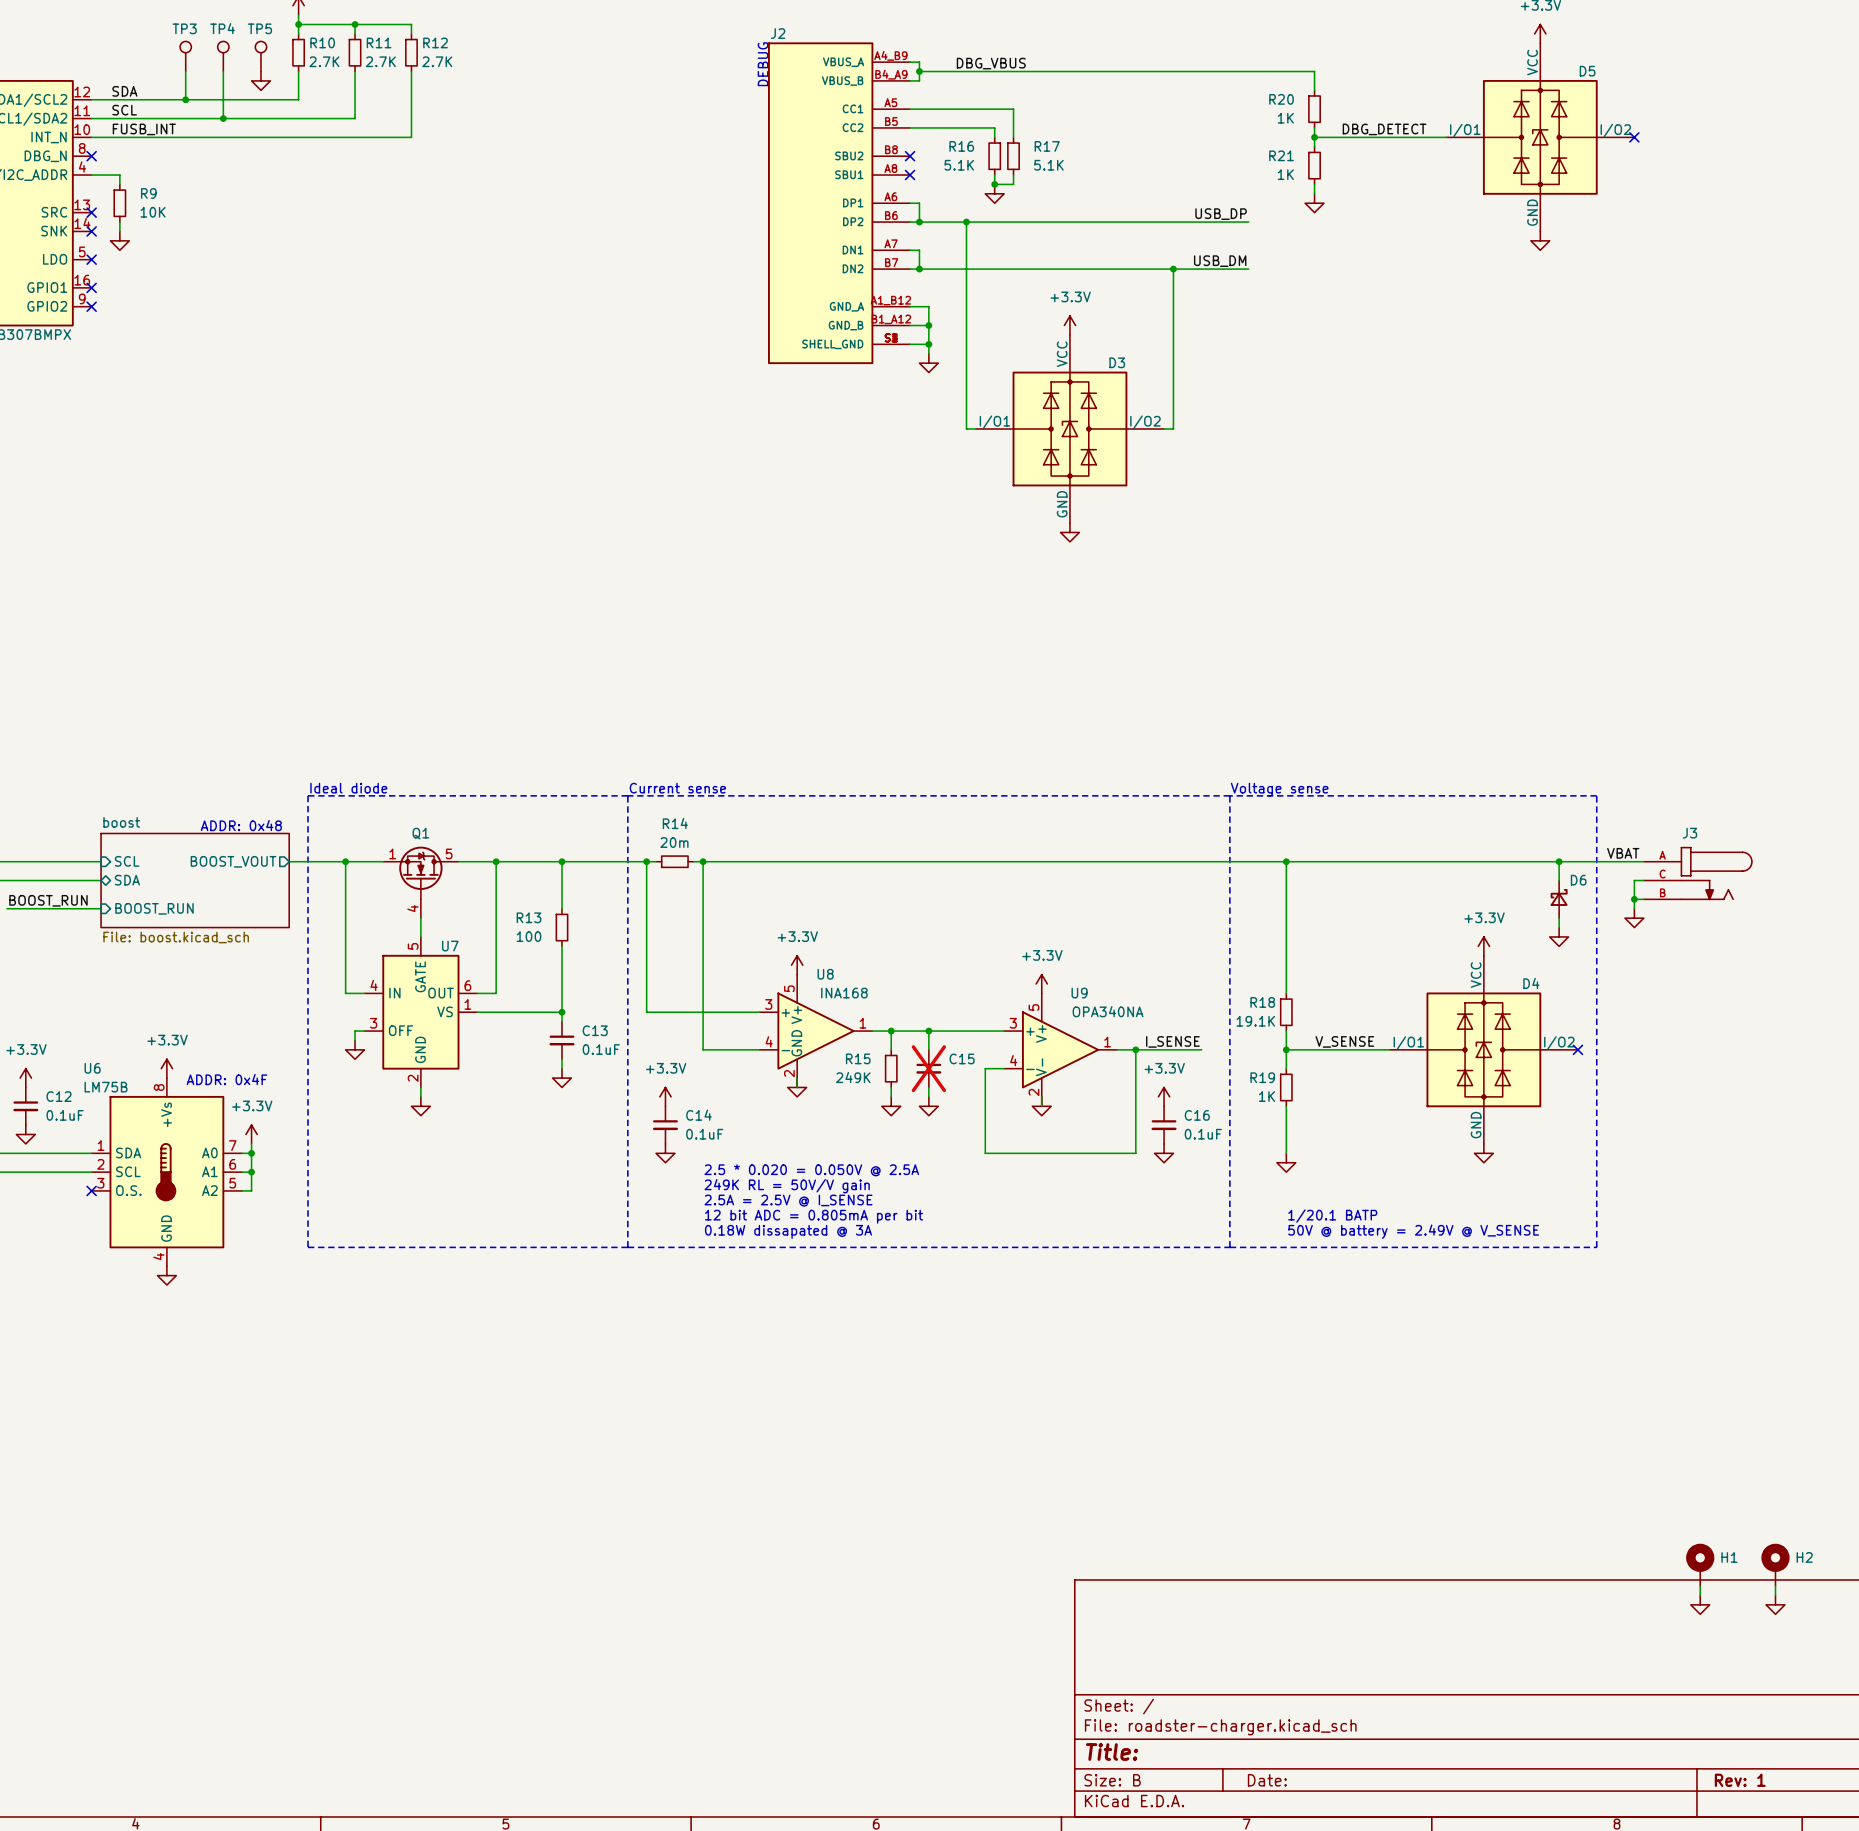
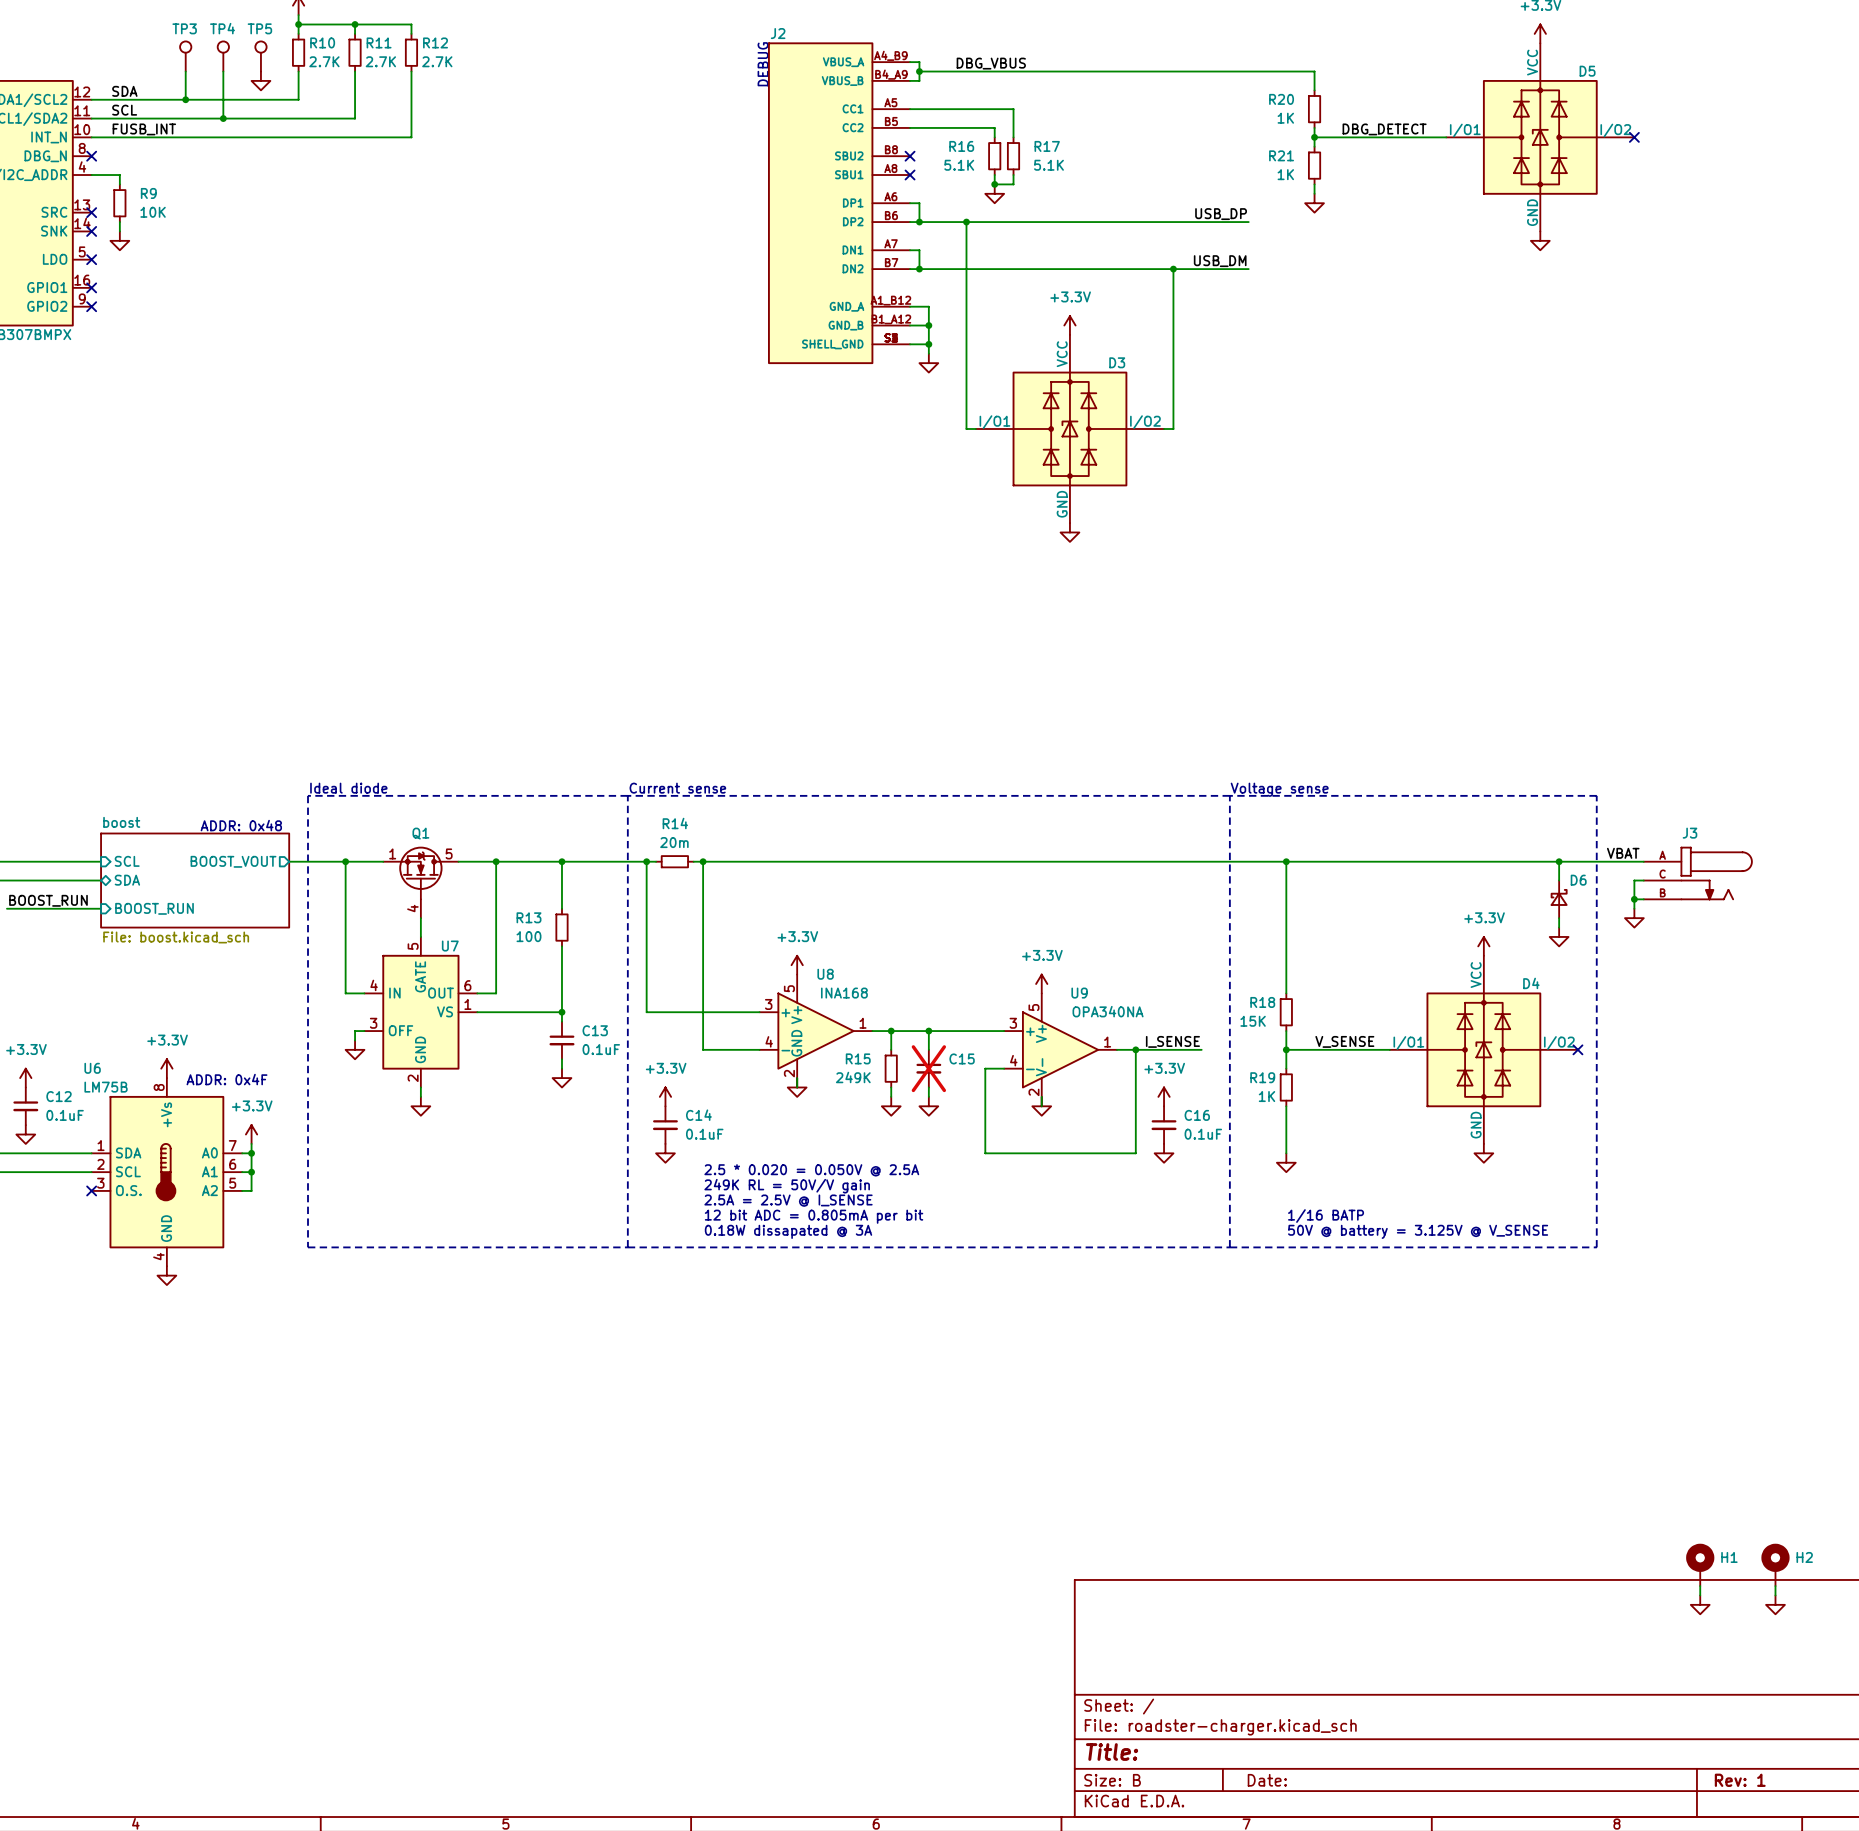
R18 value: 19.1K (1255, 1021) -> 15K (1253, 1021)
text: 1/20.1 BATP (1332, 1216) -> 1/16 BATP (1326, 1216)
text: 50V @ battery = 2.49V @ V_SENSE (1413, 1231) -> 50V @ battery = 3.125V @ V_SENSE (1418, 1231)

